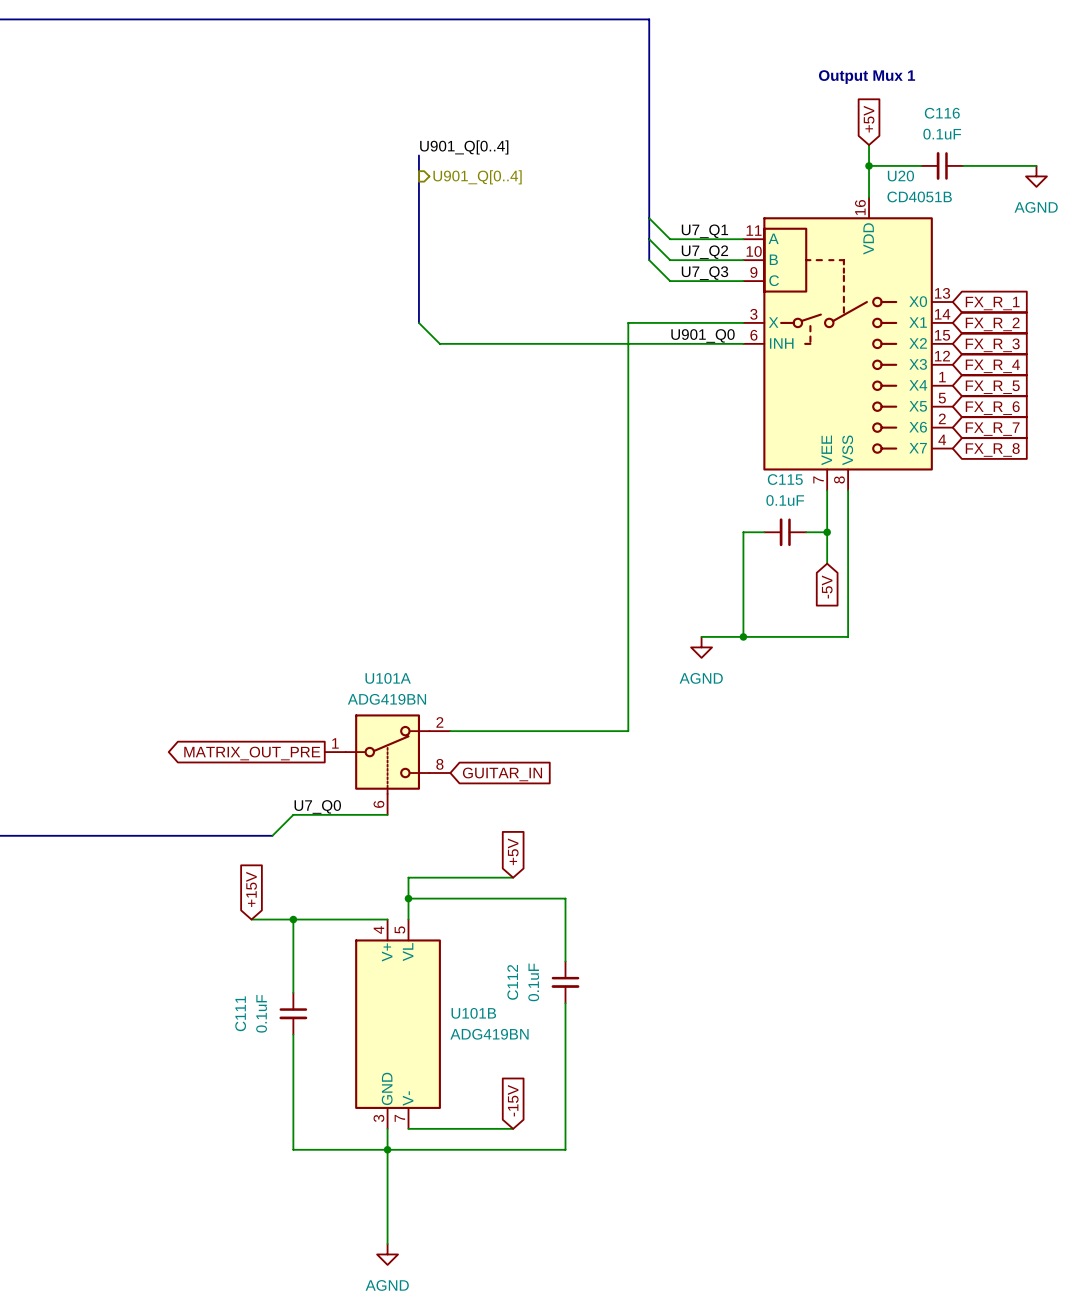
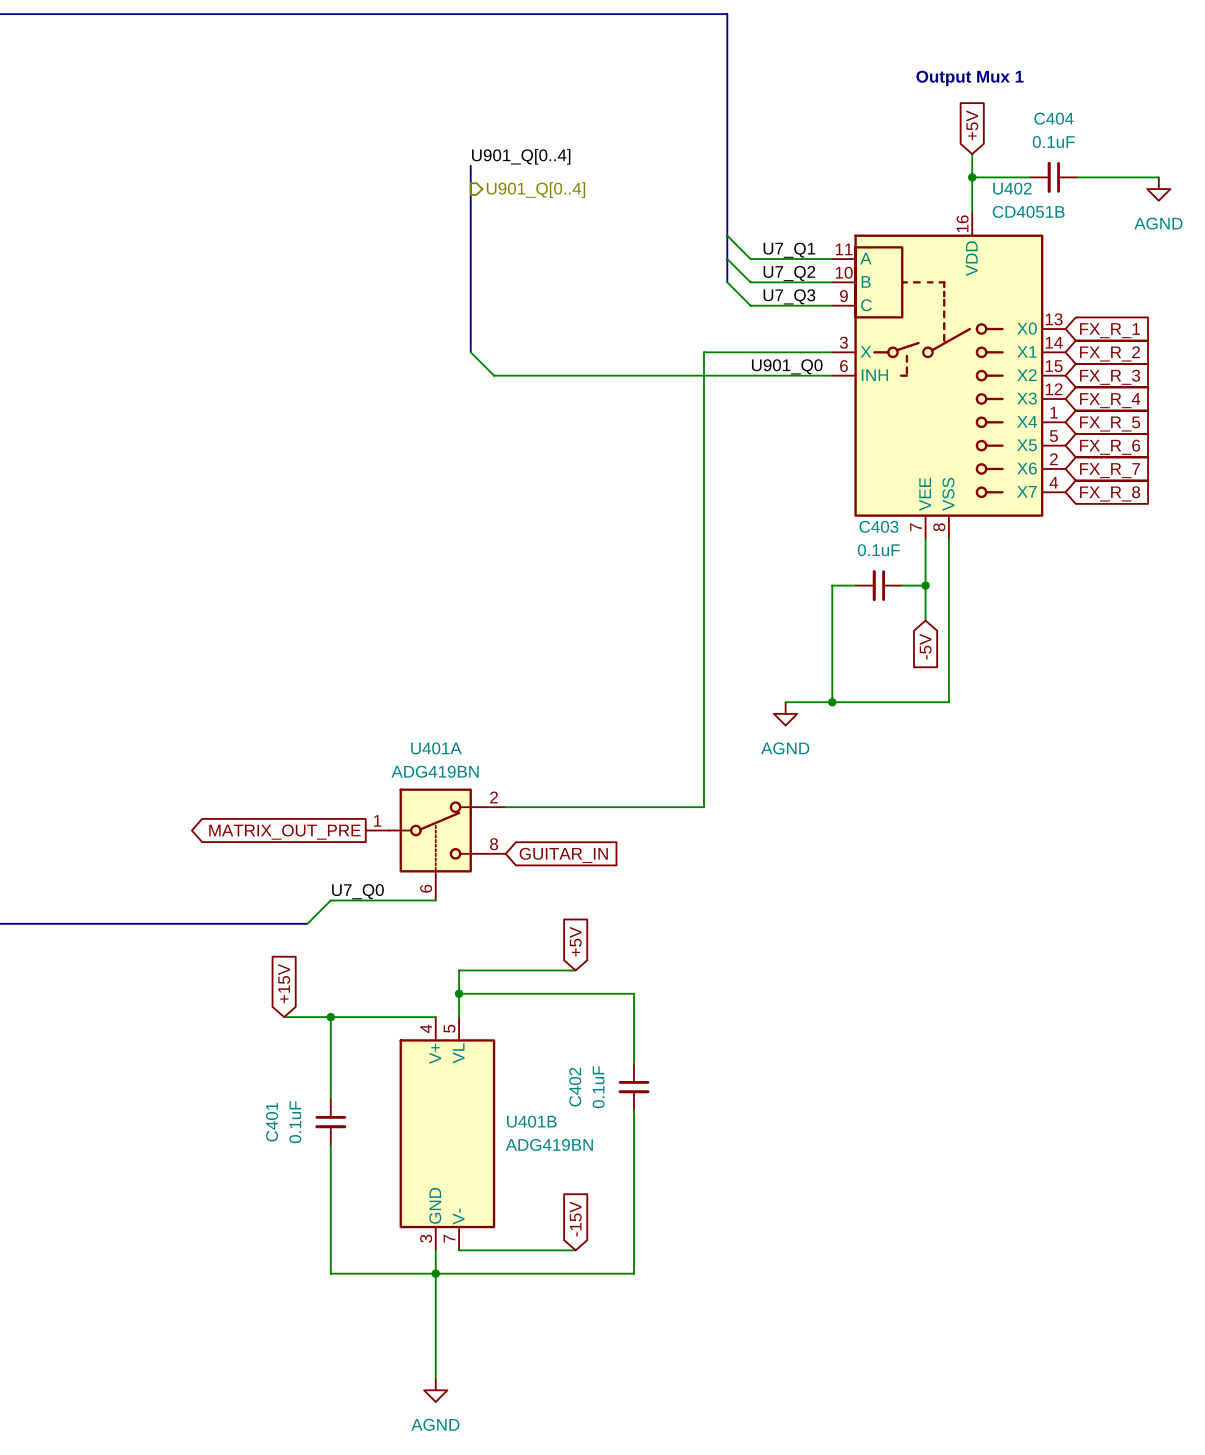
C116 name: C116 (942, 113) -> C404 (1053, 118)
U20 name: U20 (900, 176) -> U402 (1012, 188)
C115 name: C115 (785, 479) -> C403 (878, 526)
U101A name: U101A (388, 678) -> U401A (436, 748)
C112 name: C112 (512, 982) -> C402 (575, 1087)
C111 name: C111 (240, 1013) -> C401 (272, 1122)
U101B name: U101B (473, 1013) -> U401B (531, 1121)

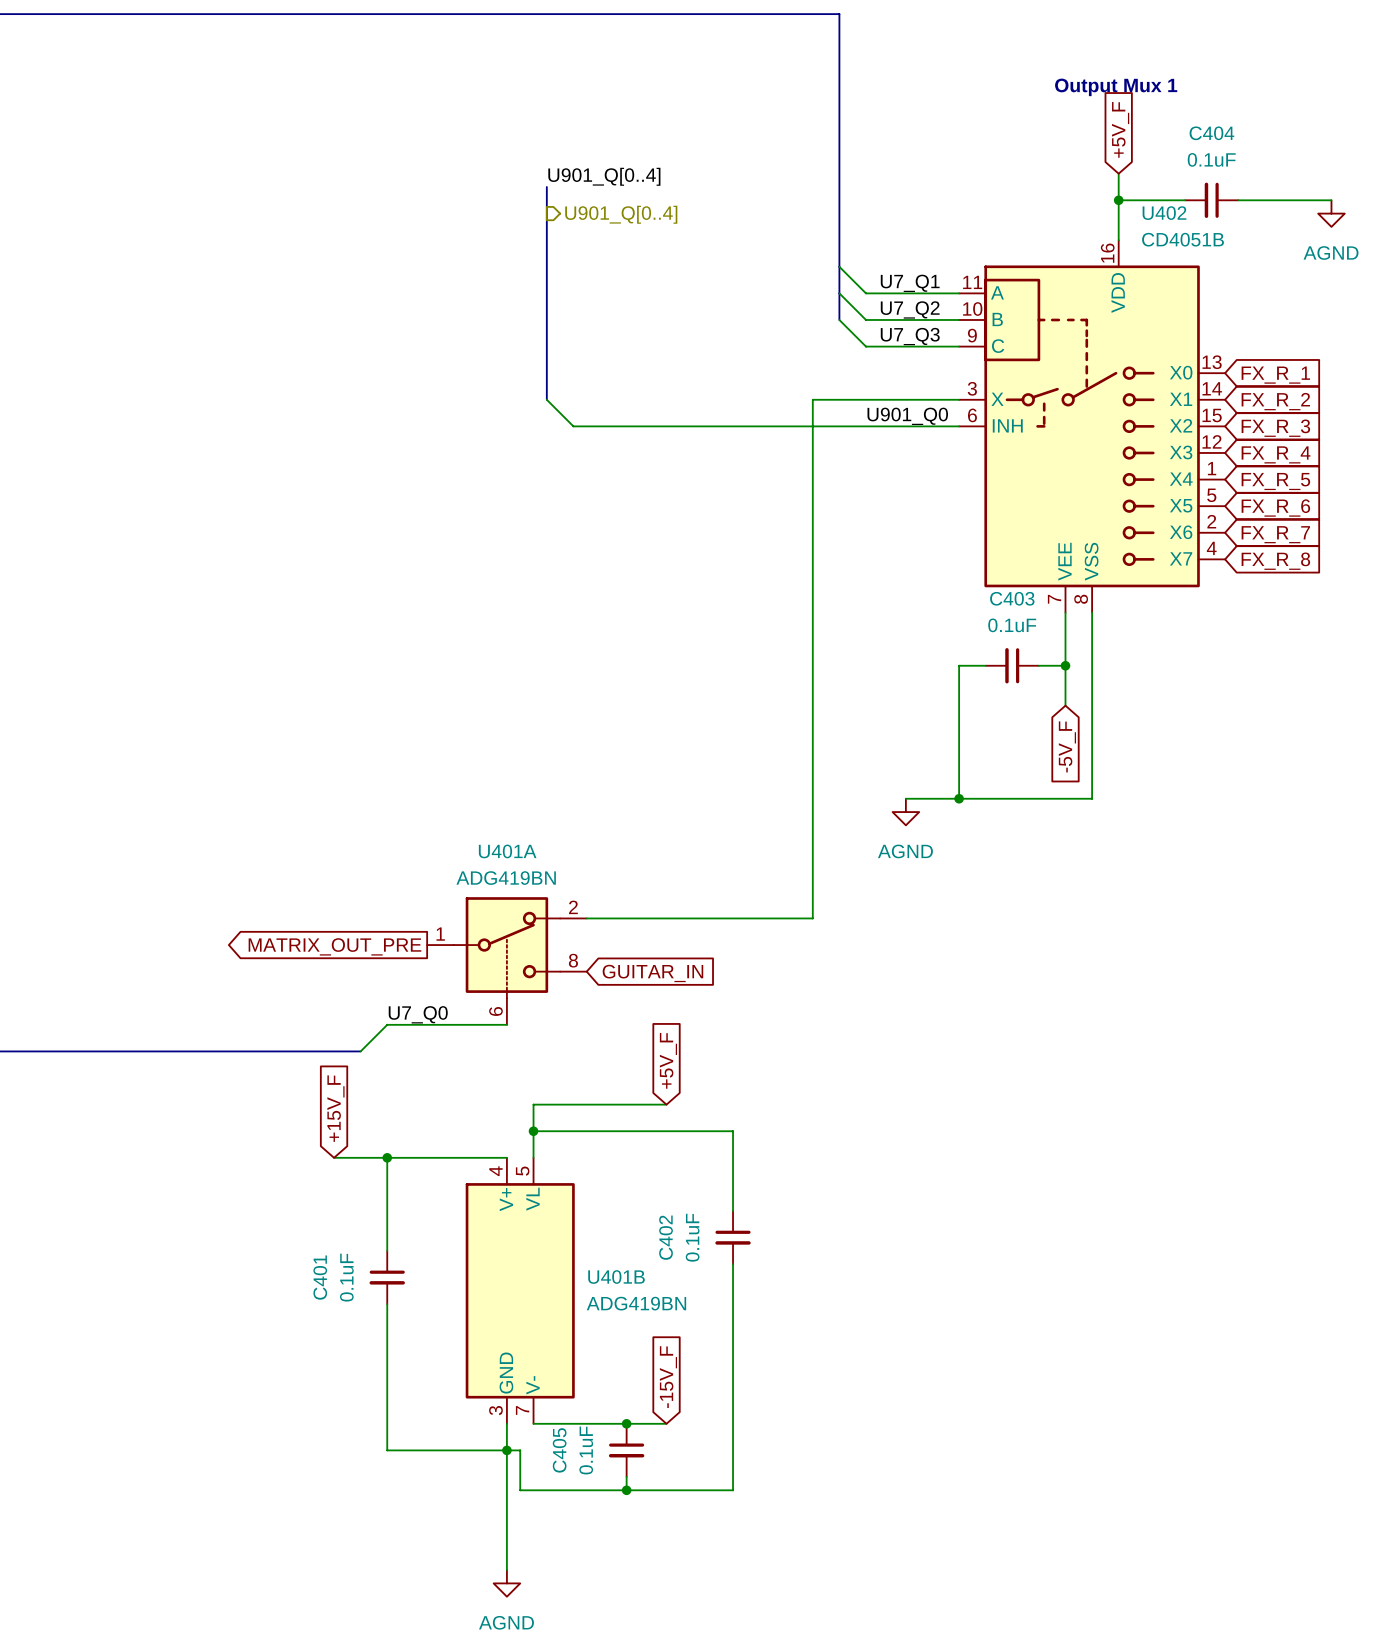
global label: +5V (972, 125) -> +5V_F (1120, 129)
global label: -5V (925, 646) -> -5V_F (1067, 746)
global label: +5V (575, 941) -> +5V_F (668, 1060)
global label: +15V (284, 983) -> +15V_F (335, 1108)
global label: -15V (575, 1218) -> -15V_F (668, 1377)
junction: none -> (626, 1423)
wire: (447, 1273) (634, 1273) -> (520, 1450) (520, 1490) (733, 1490) (733, 1450)
C405: none -> 0.1uF (626, 1450)
wire: none -> (626, 1477) (626, 1490)
junction: none -> (626, 1490)

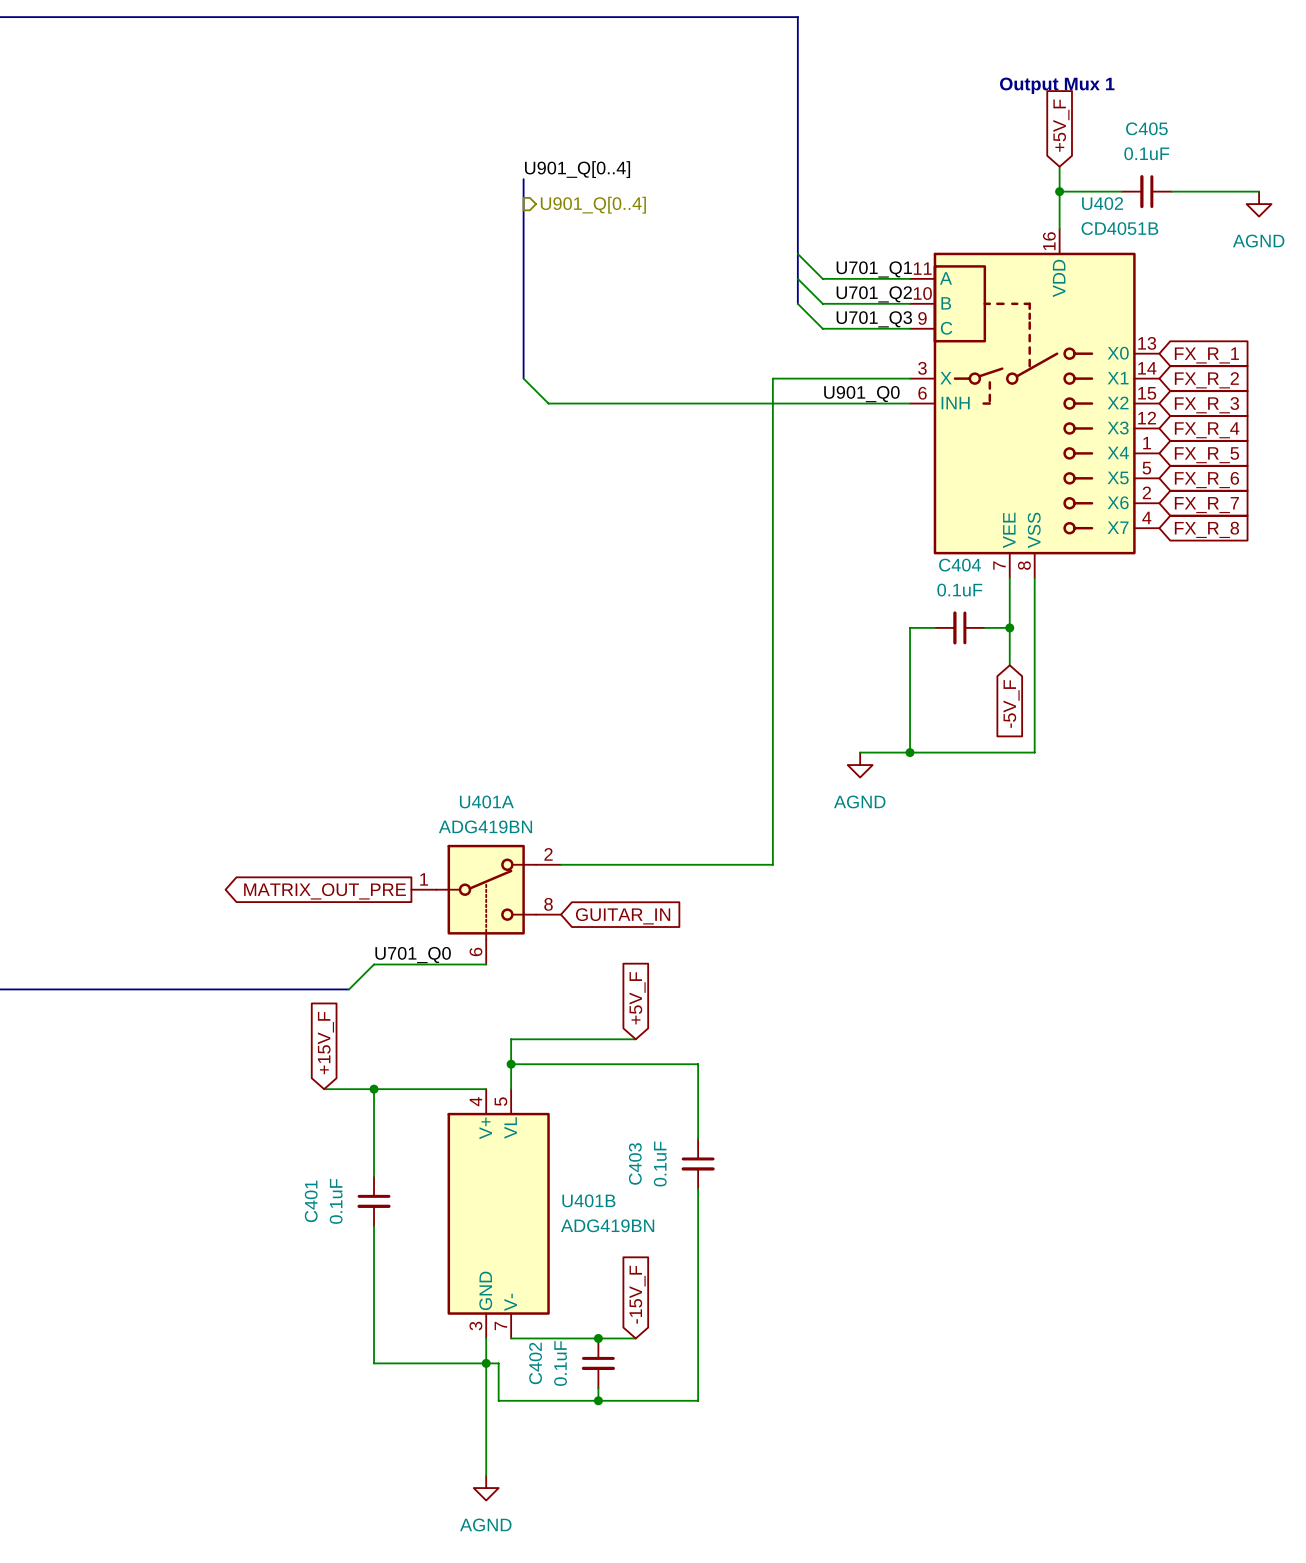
C404 name: C404 (1211, 133) -> C405 (1146, 128)
label: U7_Q1 (910, 283) -> U701_Q1 (874, 269)
label: U7_Q2 (910, 309) -> U701_Q2 (874, 294)
label: U7_Q3 (910, 336) -> U701_Q3 (874, 319)
C403 name: C403 (1012, 598) -> C404 (960, 565)
label: U7_Q0 (418, 1014) -> U701_Q0 (413, 955)
C402 name: C402 (666, 1237) -> C403 (635, 1163)
C405 name: C405 (559, 1450) -> C402 (535, 1363)

